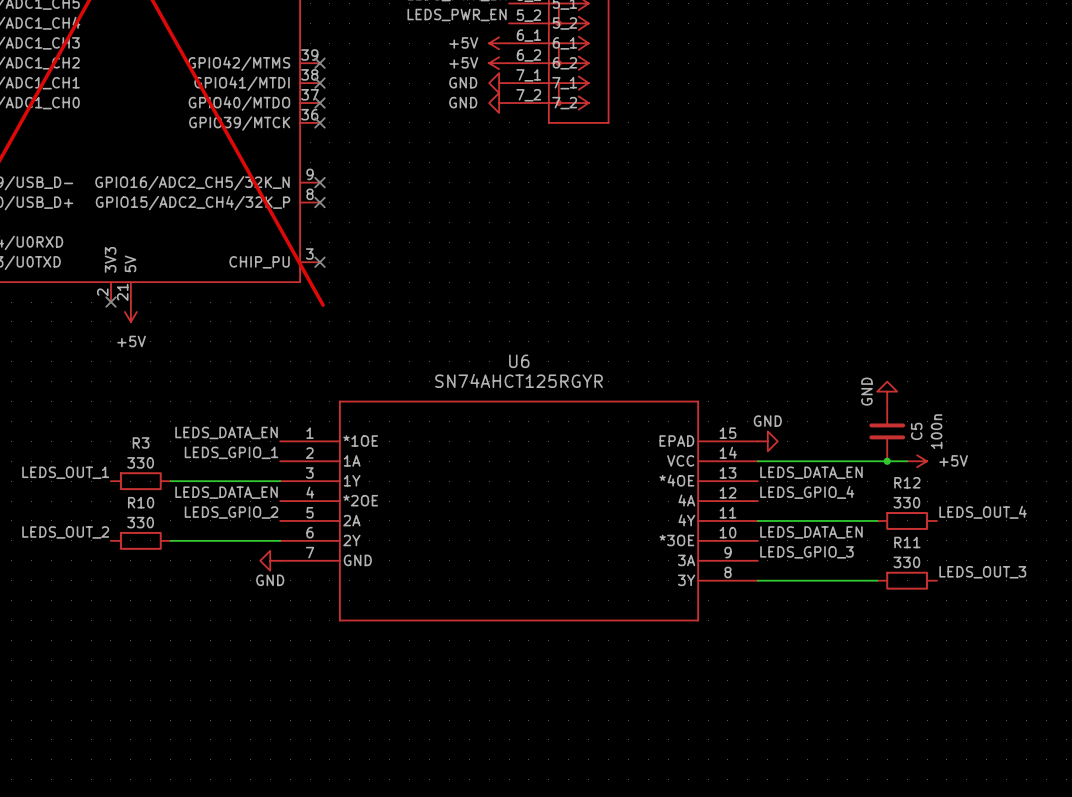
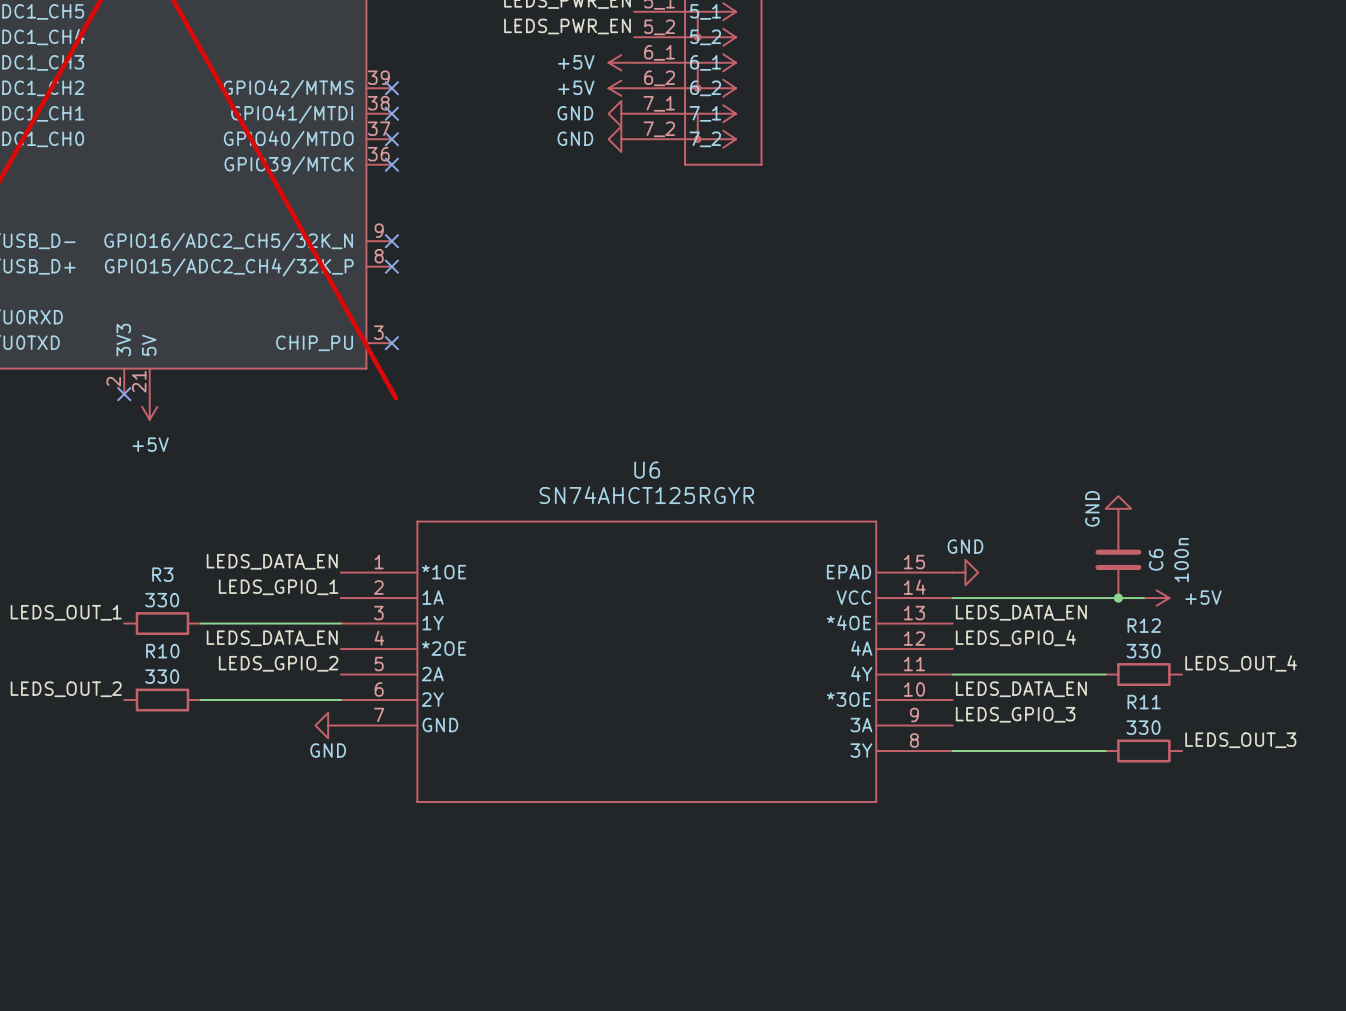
C5 name: C5 (916, 431) -> C6 (1156, 559)

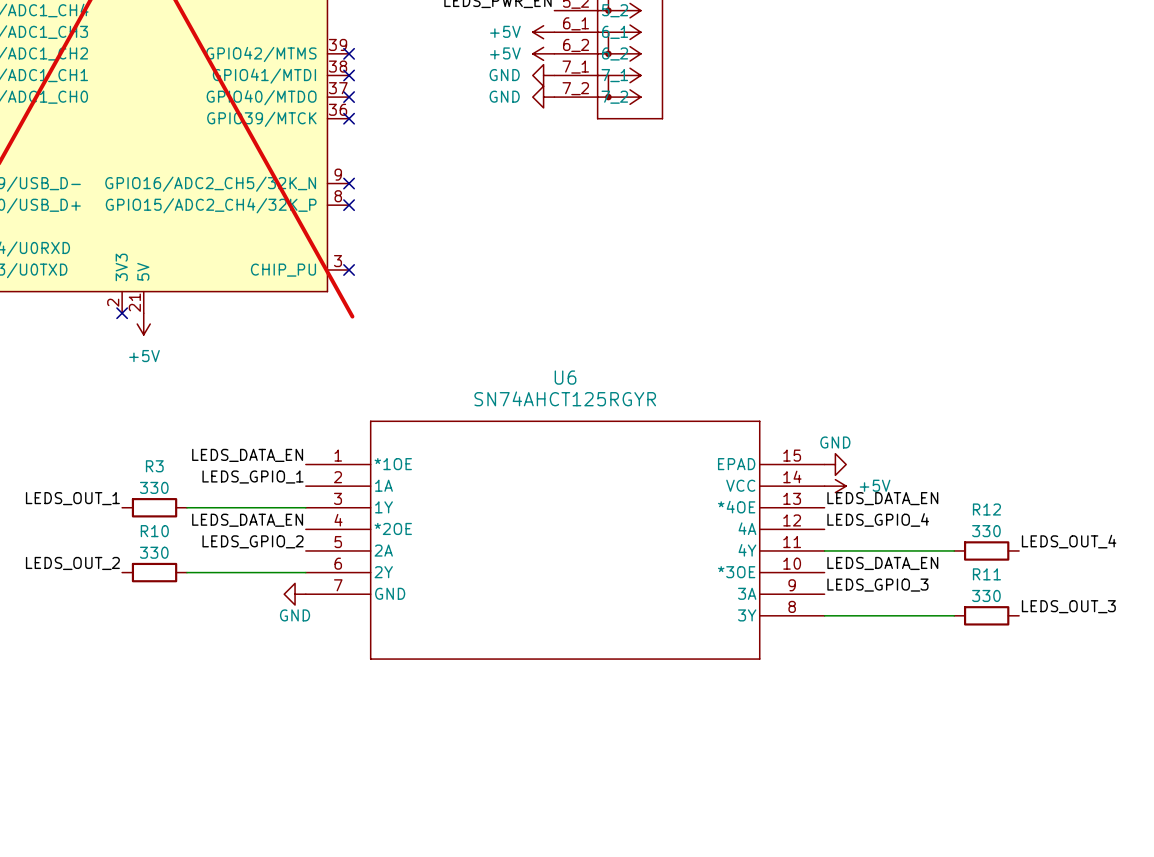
power symbol: GND (1118, 508) -> none
C6: 100n (1118, 559) -> none
wire: (952, 598) (1143, 598) -> none
junction: (1118, 598) -> none
power symbol position: +5V (1156, 598) -> +5V (835, 486)

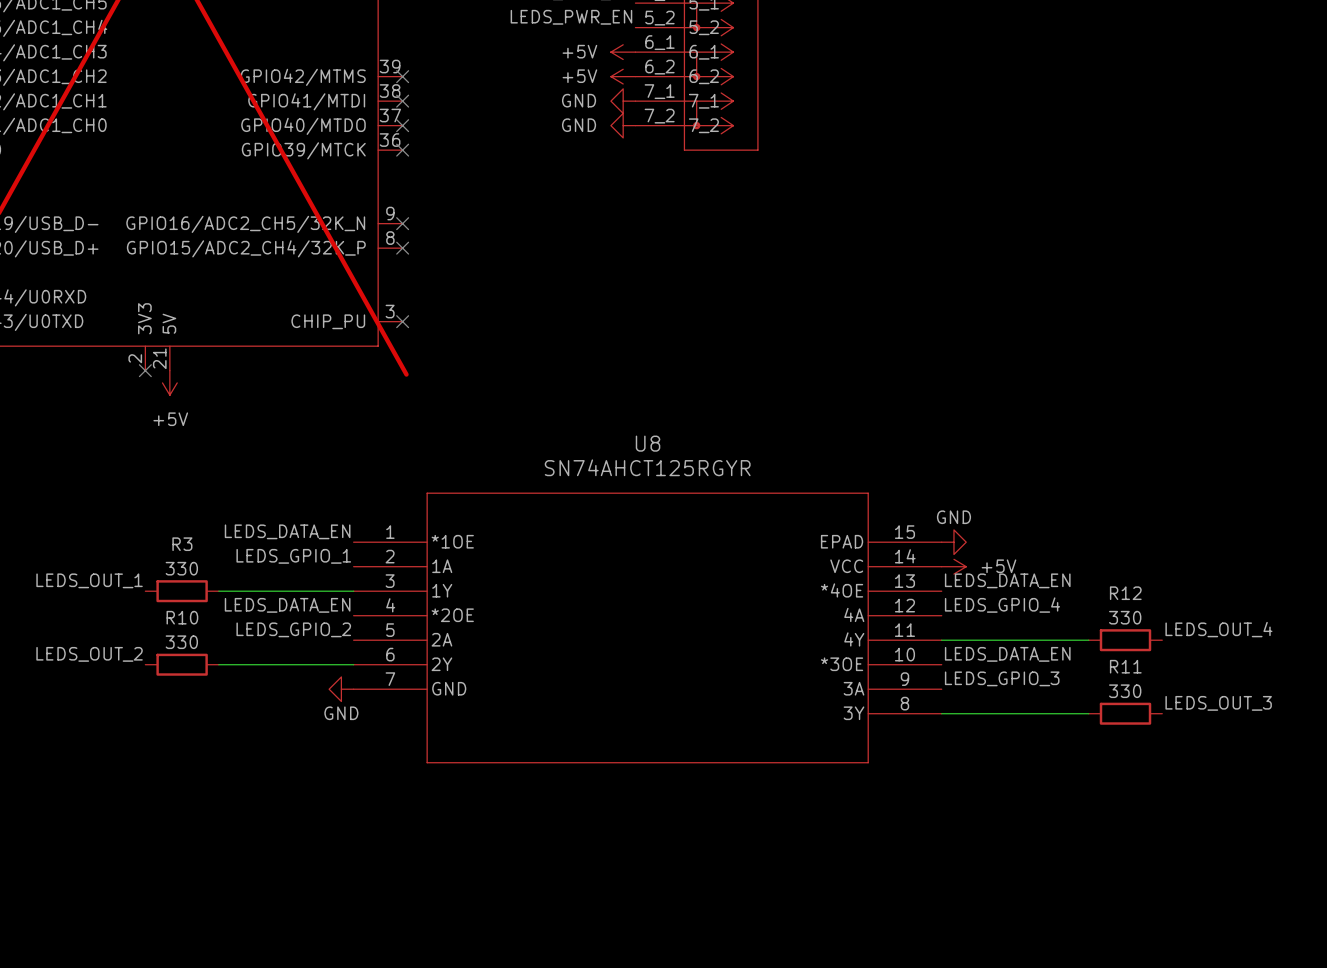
U6 name: U6 (565, 377) -> U8 (648, 443)

